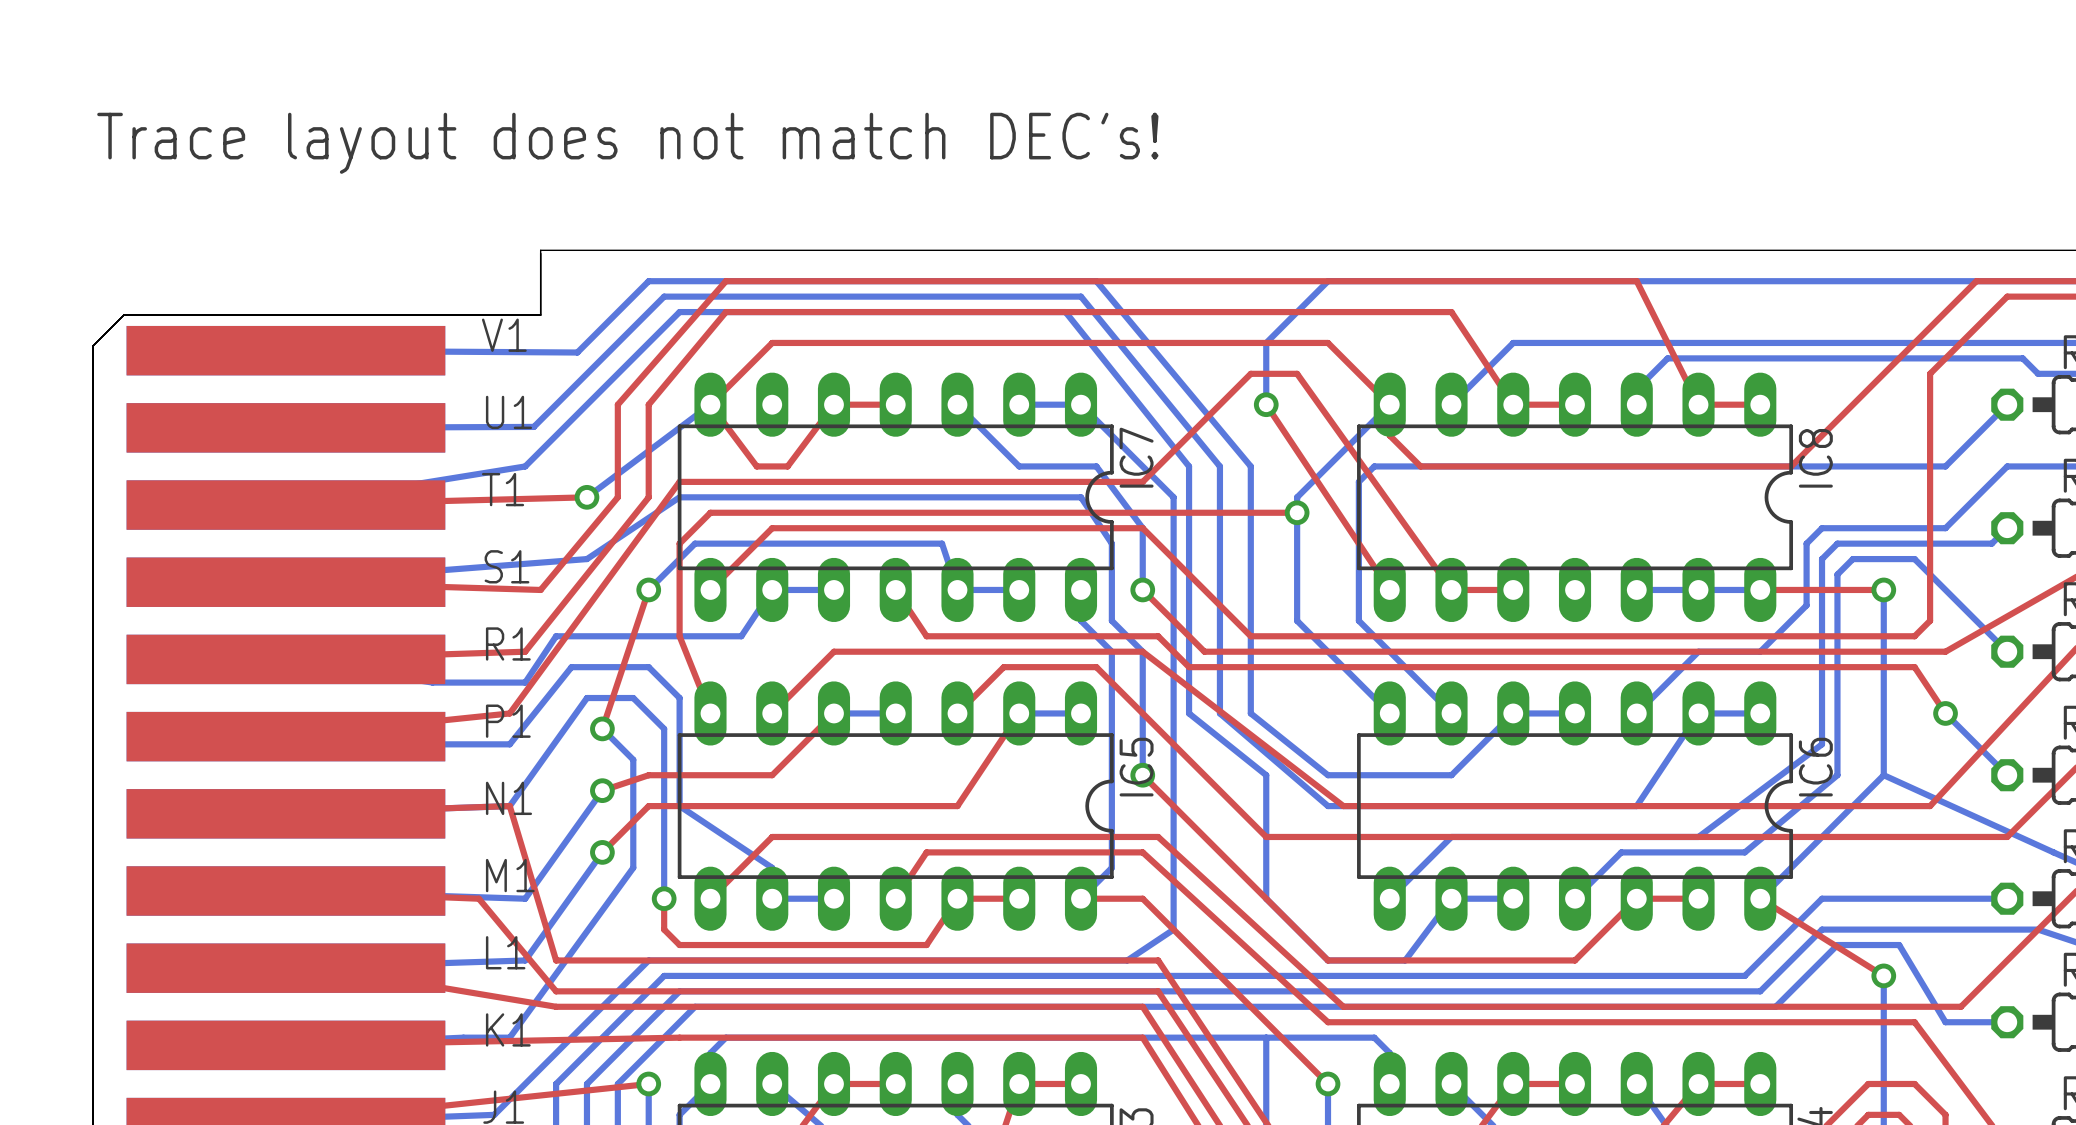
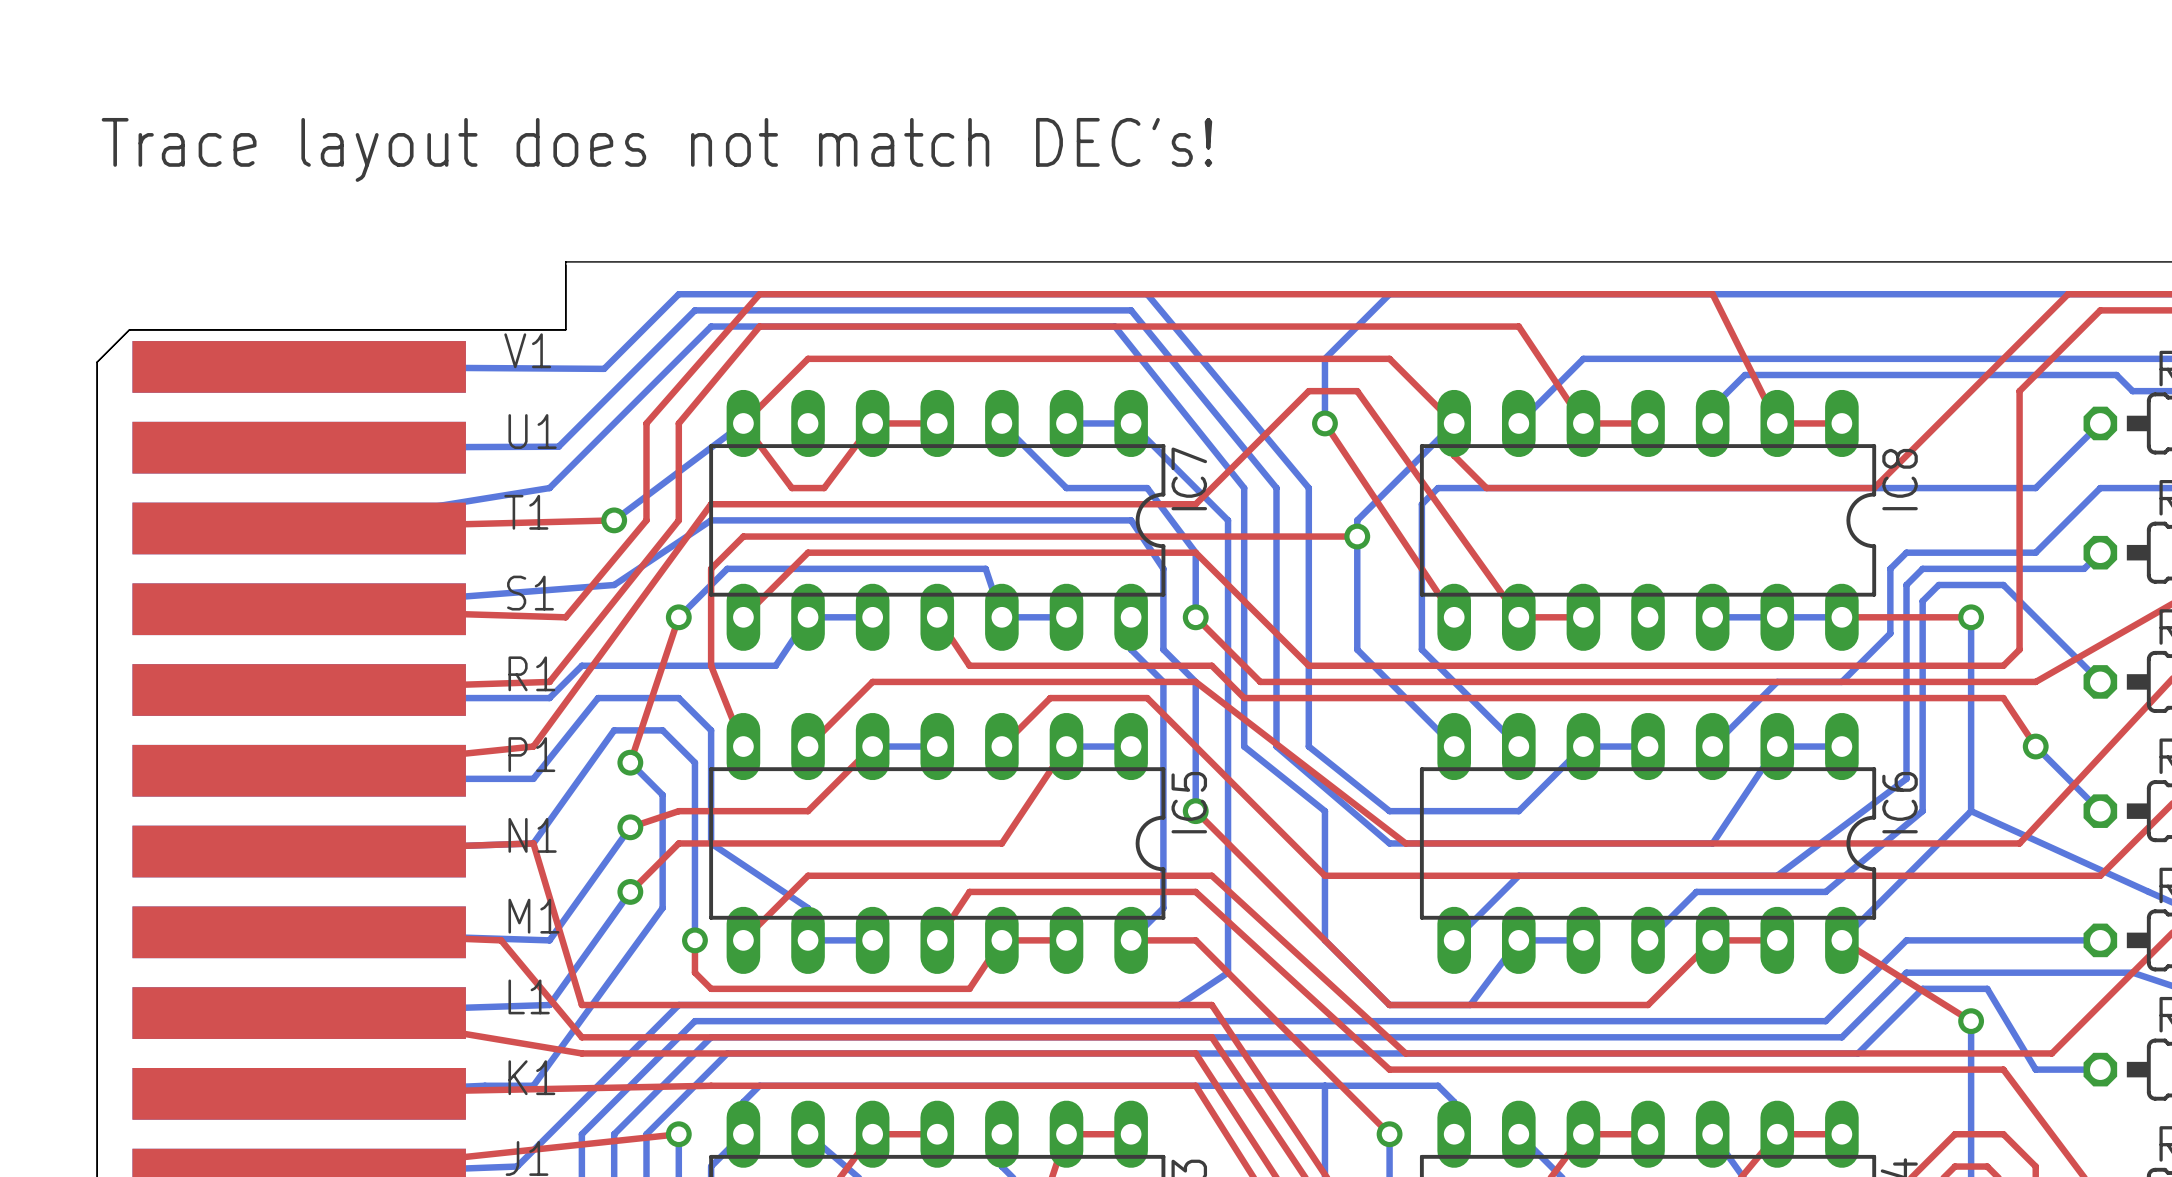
bottom track: (556, 636) (525, 682) (432, 682) (285, 659) -> (581, 665) (549, 698) (452, 698) (299, 690)

